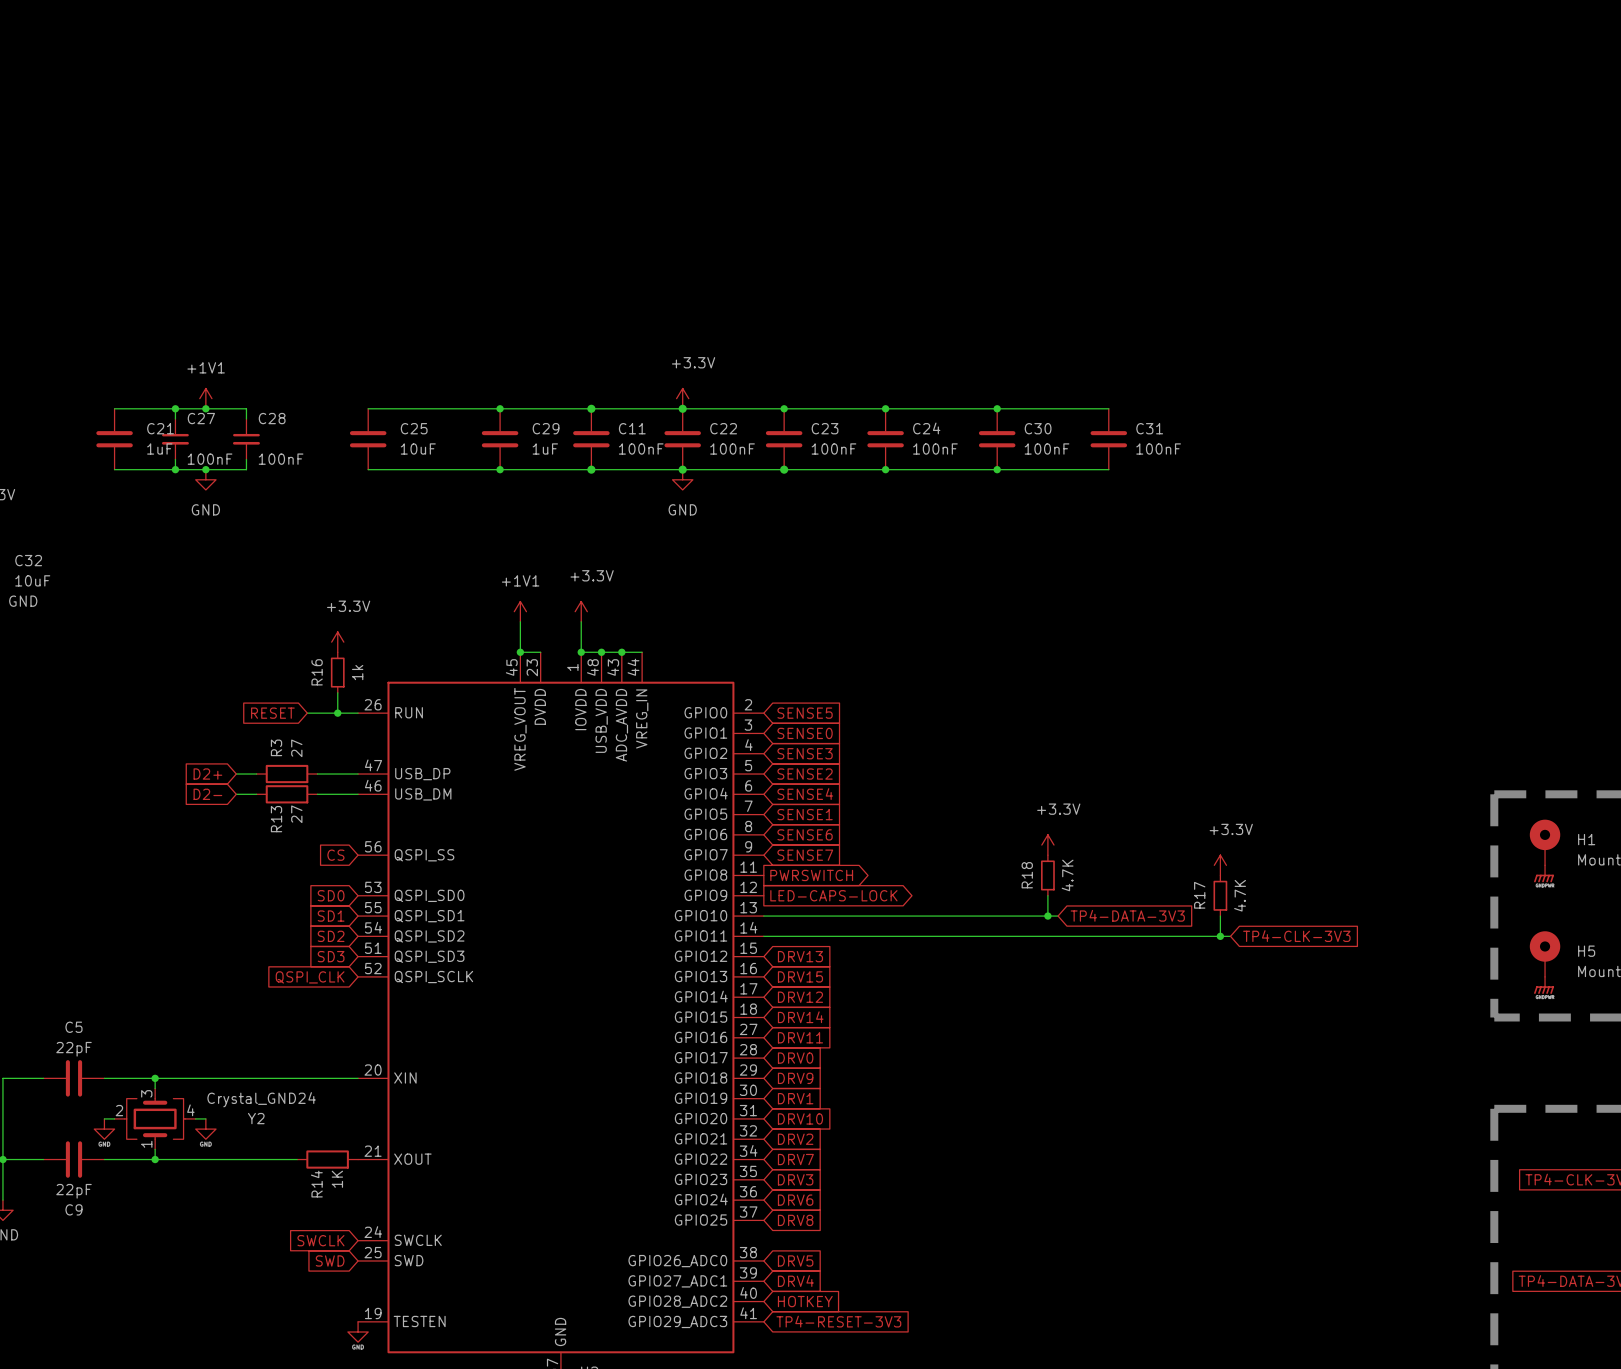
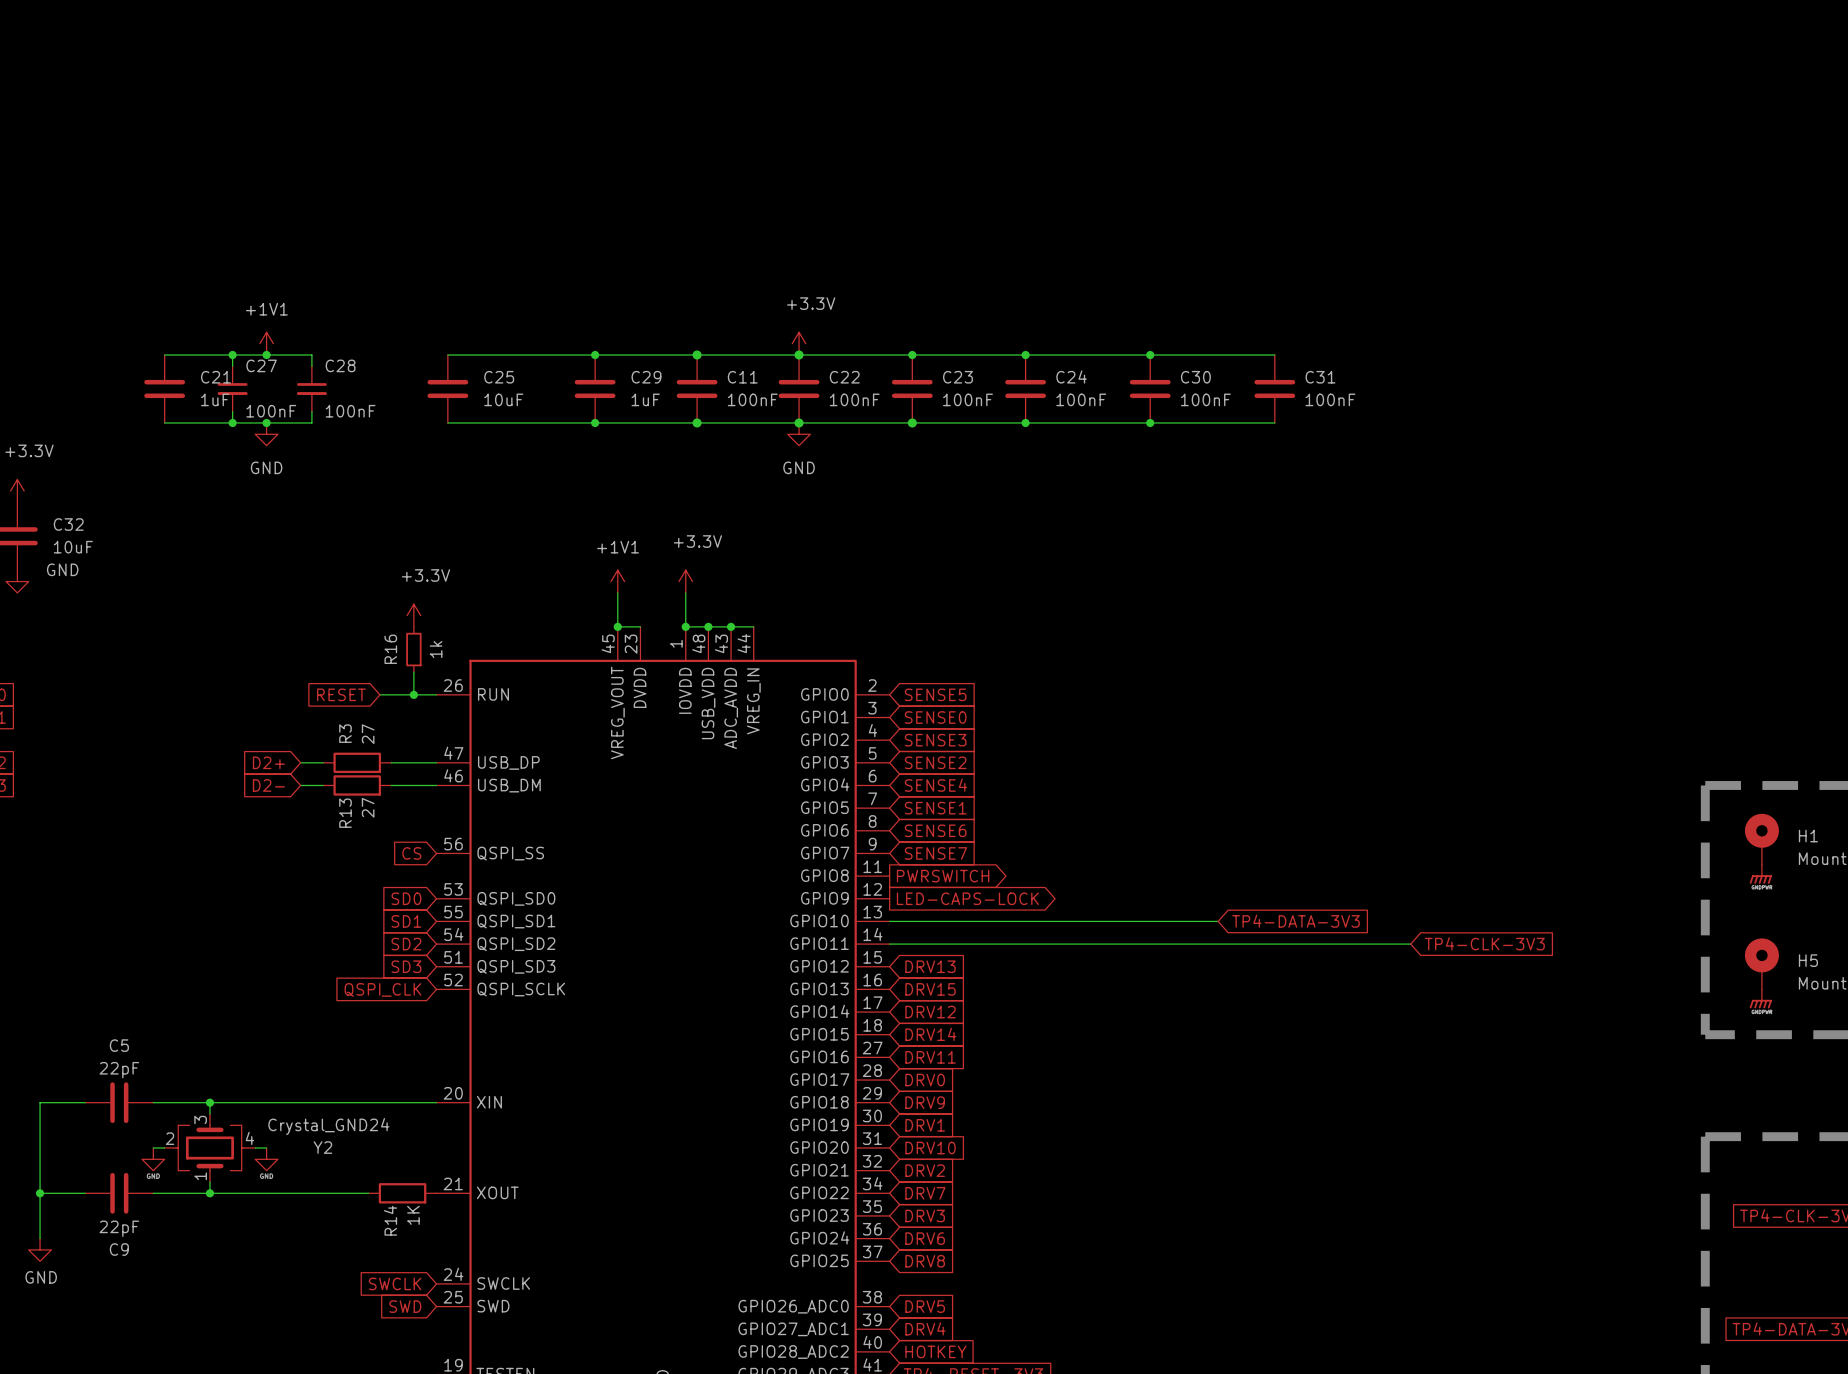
power symbol: +3.3V (1047, 845) -> none
power symbol: +3.3V (1220, 865) -> none
R18: 4.7K (1047, 875) -> none
wire: (1047, 895) (1047, 916) -> none
R17: 4.7K (1220, 895) -> none
junction: (1047, 916) -> none
wire: (1220, 916) (1220, 936) -> none
junction: (1220, 936) -> none

